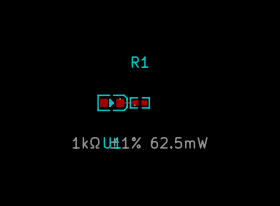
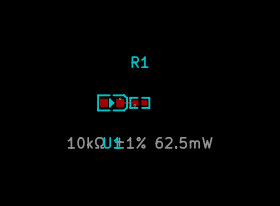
R1 value: 1kΩ ±1% 62.5mW (140, 142) -> 10kΩ ±1% 62.5mW (140, 142)

